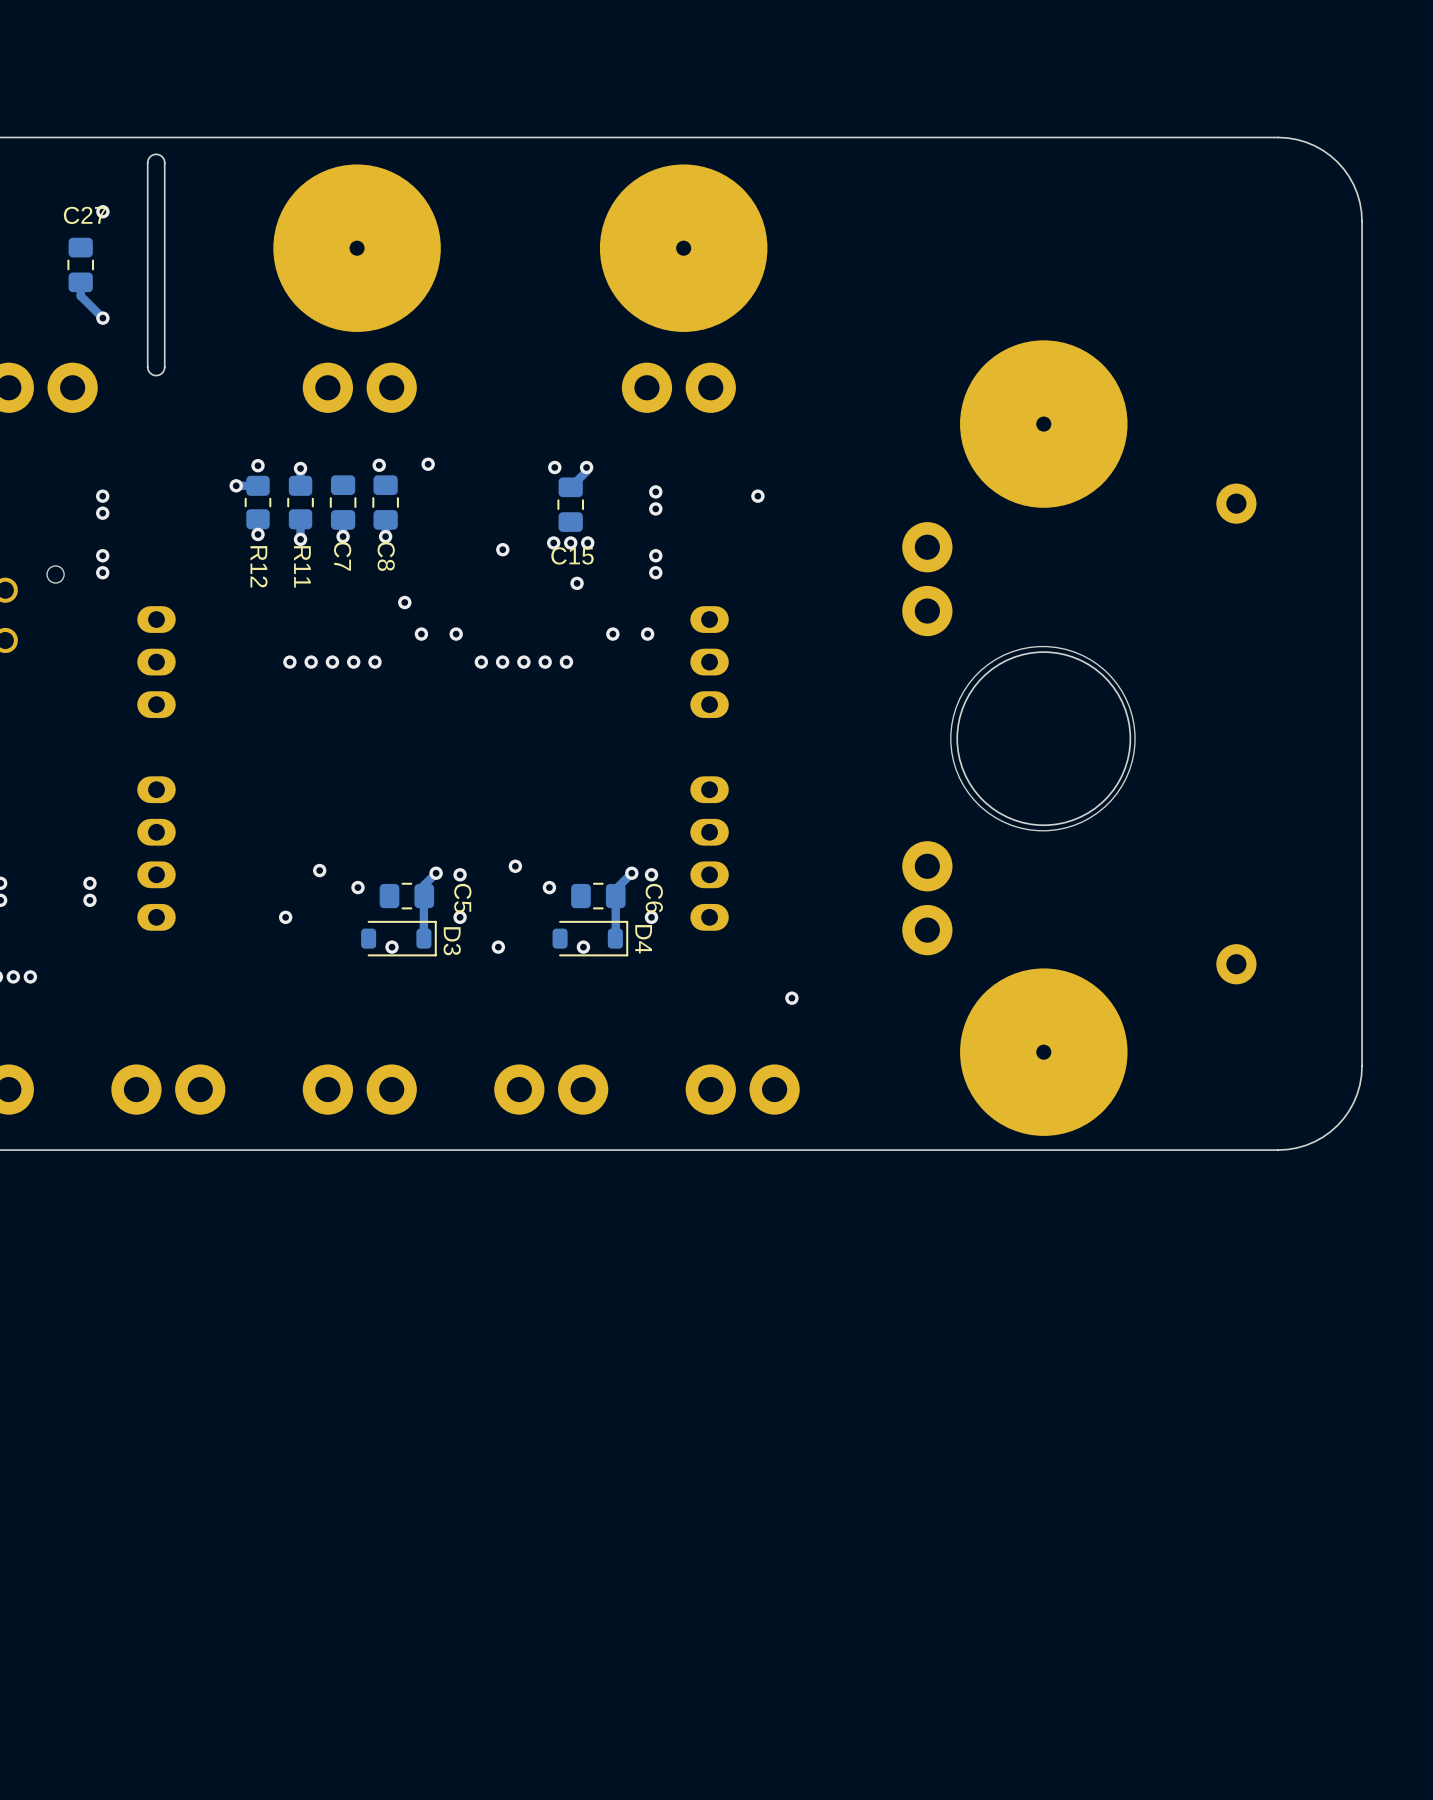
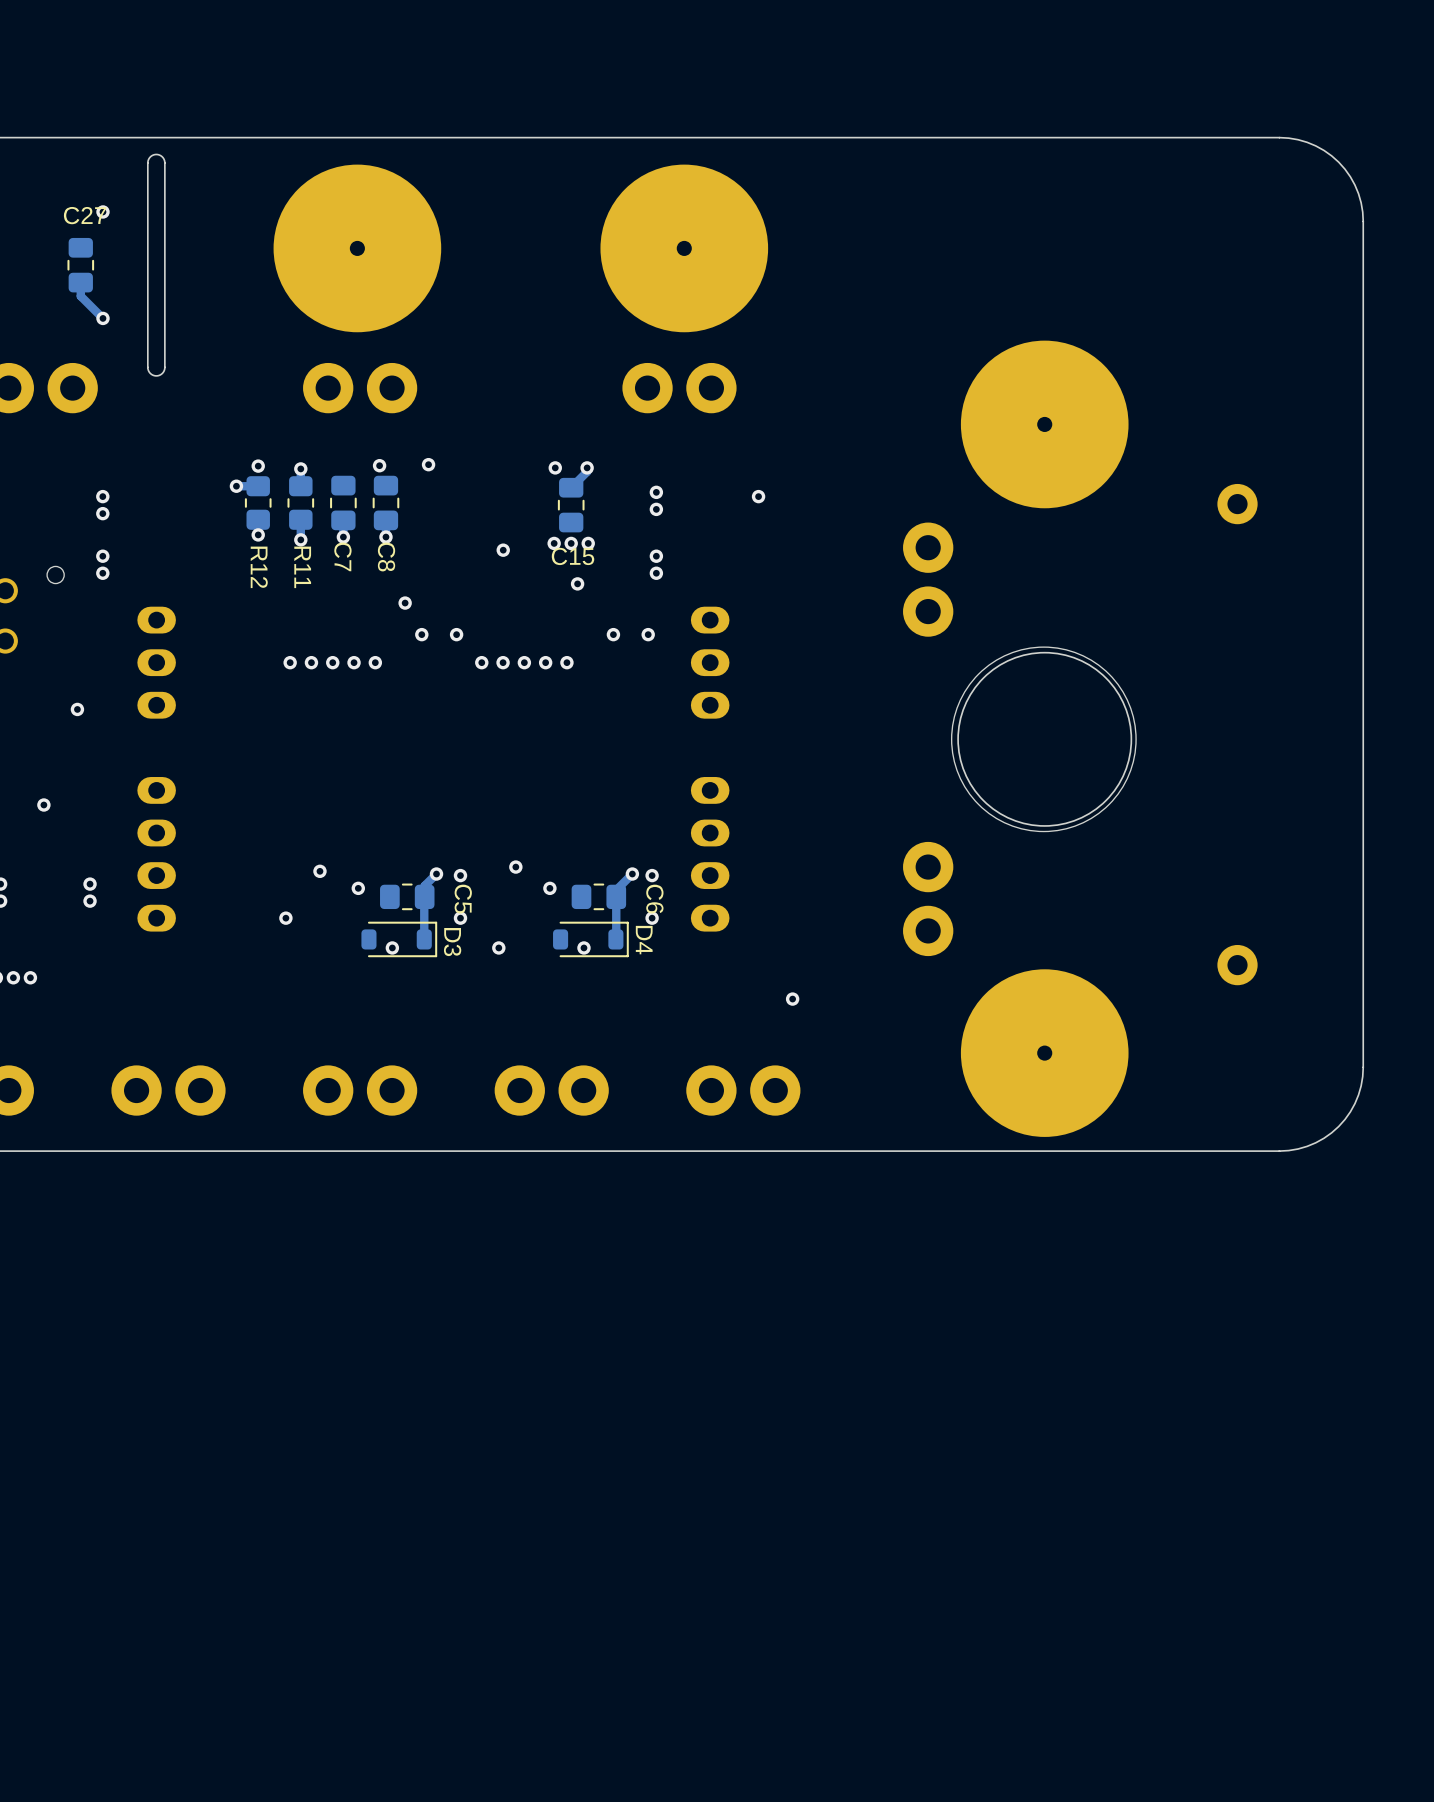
via: none -> (77, 709)
via: none -> (43, 805)

